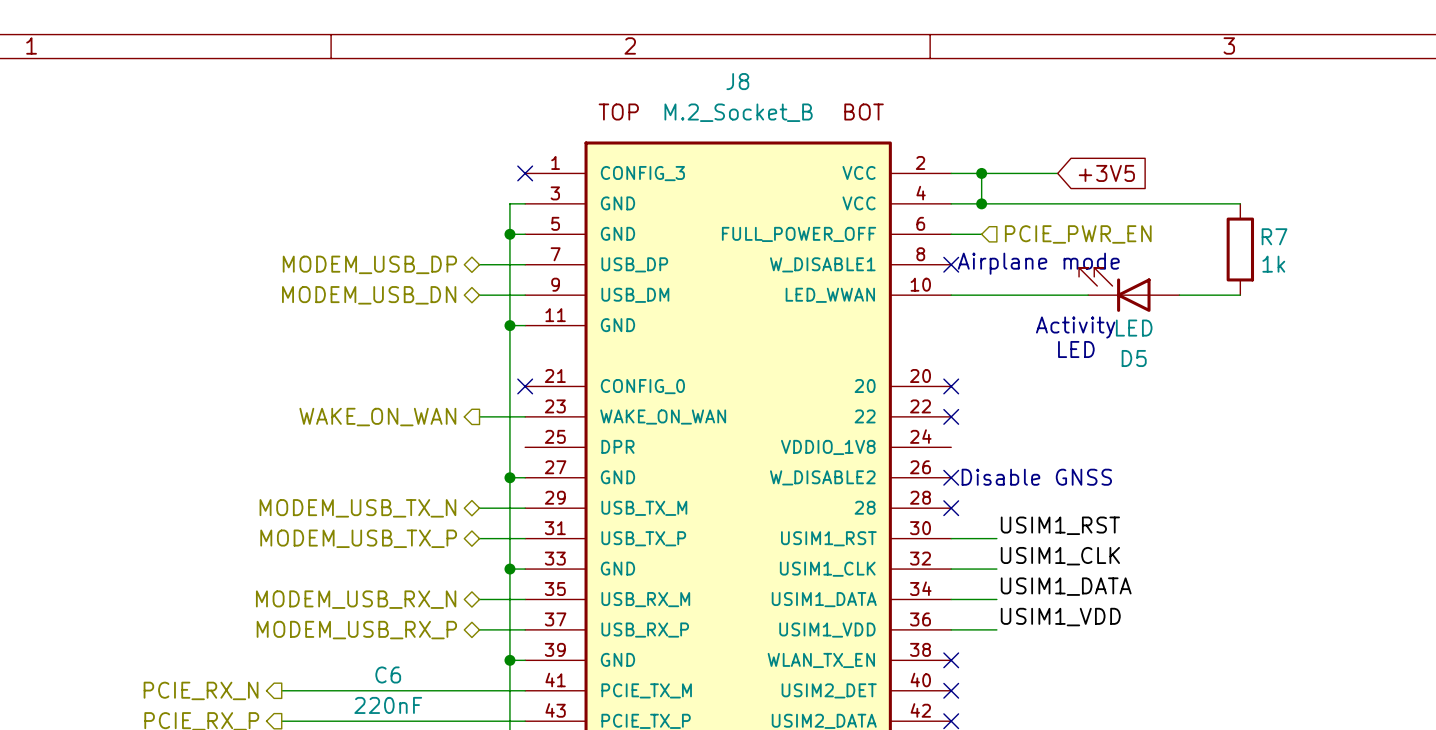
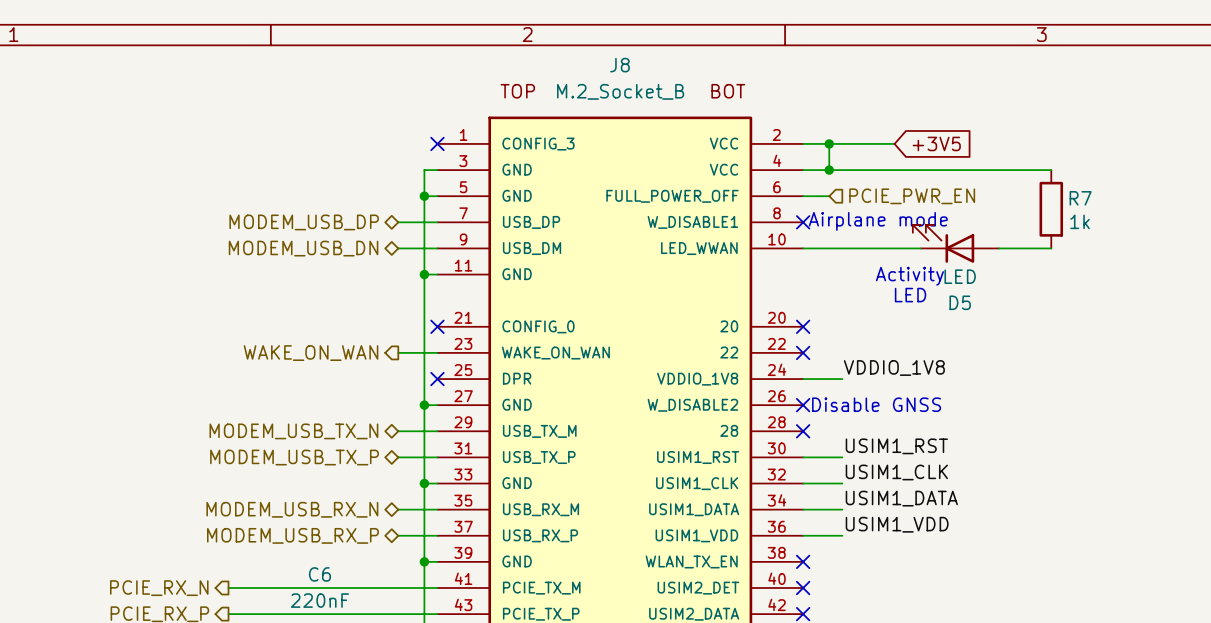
label: none -> VDDIO_1V8 (894, 368)
no-connect mark: none -> (437, 379)
wire: none -> (803, 379) (842, 379)

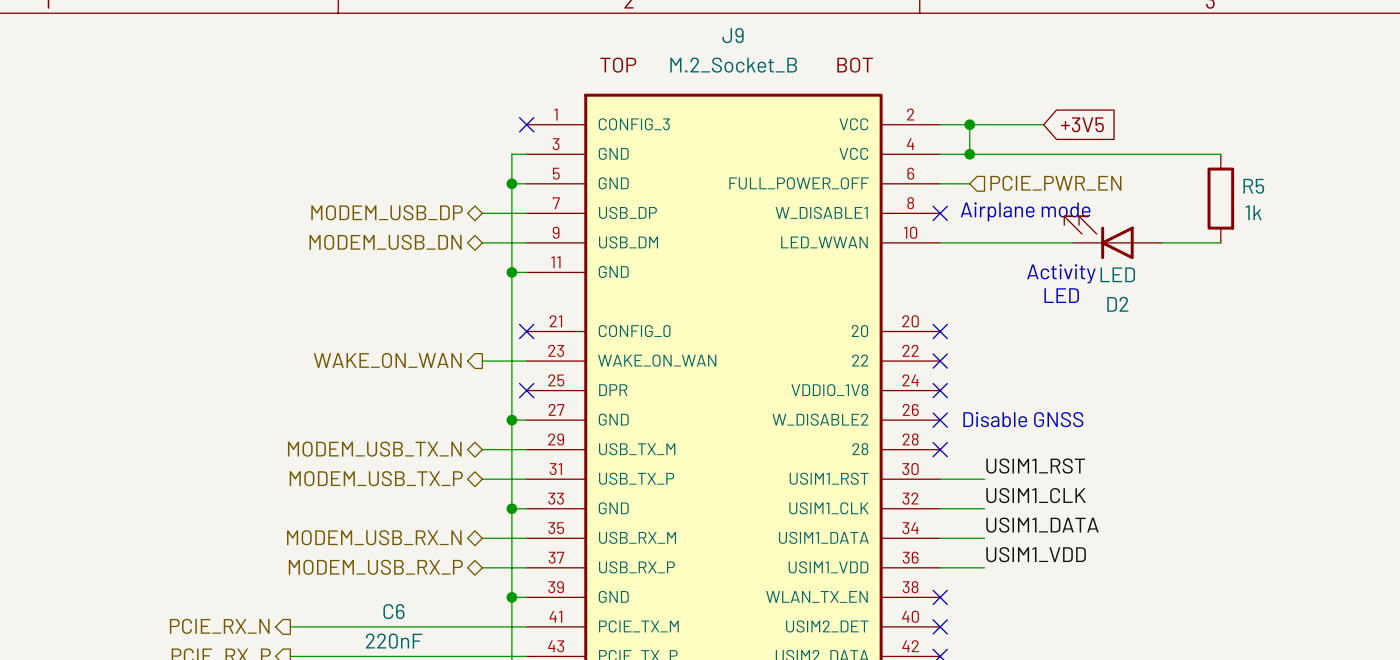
J8 name: J8 (619, 65) -> J9 (733, 35)
R7 name: R7 (1080, 198) -> R5 (1253, 186)
D5 name: D5 (960, 302) -> D2 (1117, 304)
label: VDDIO_1V8 (894, 368) -> none
wire: (803, 379) (842, 379) -> none
no-connect mark: none -> (940, 390)

